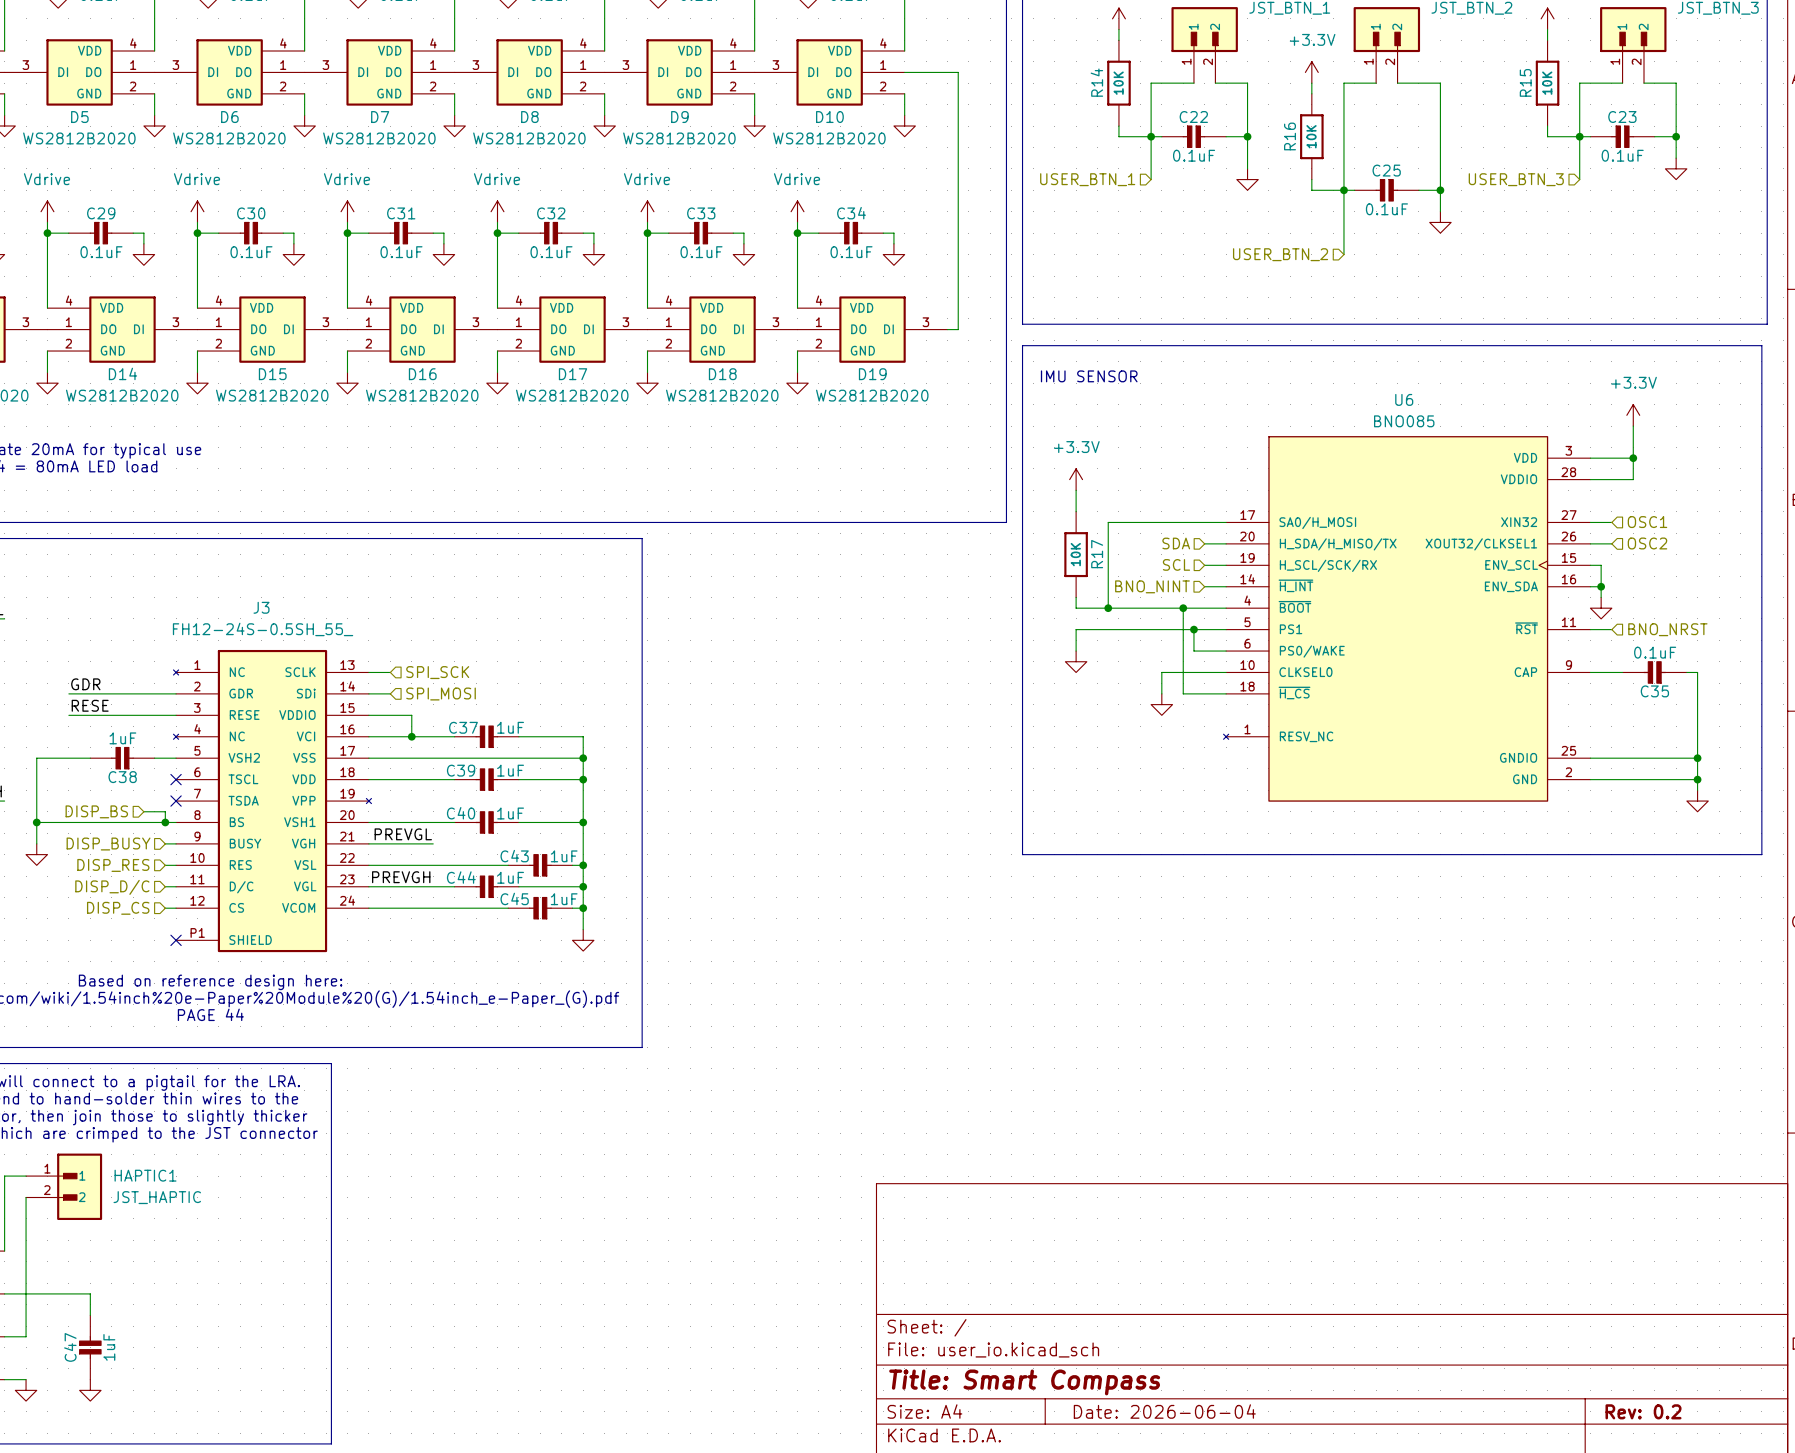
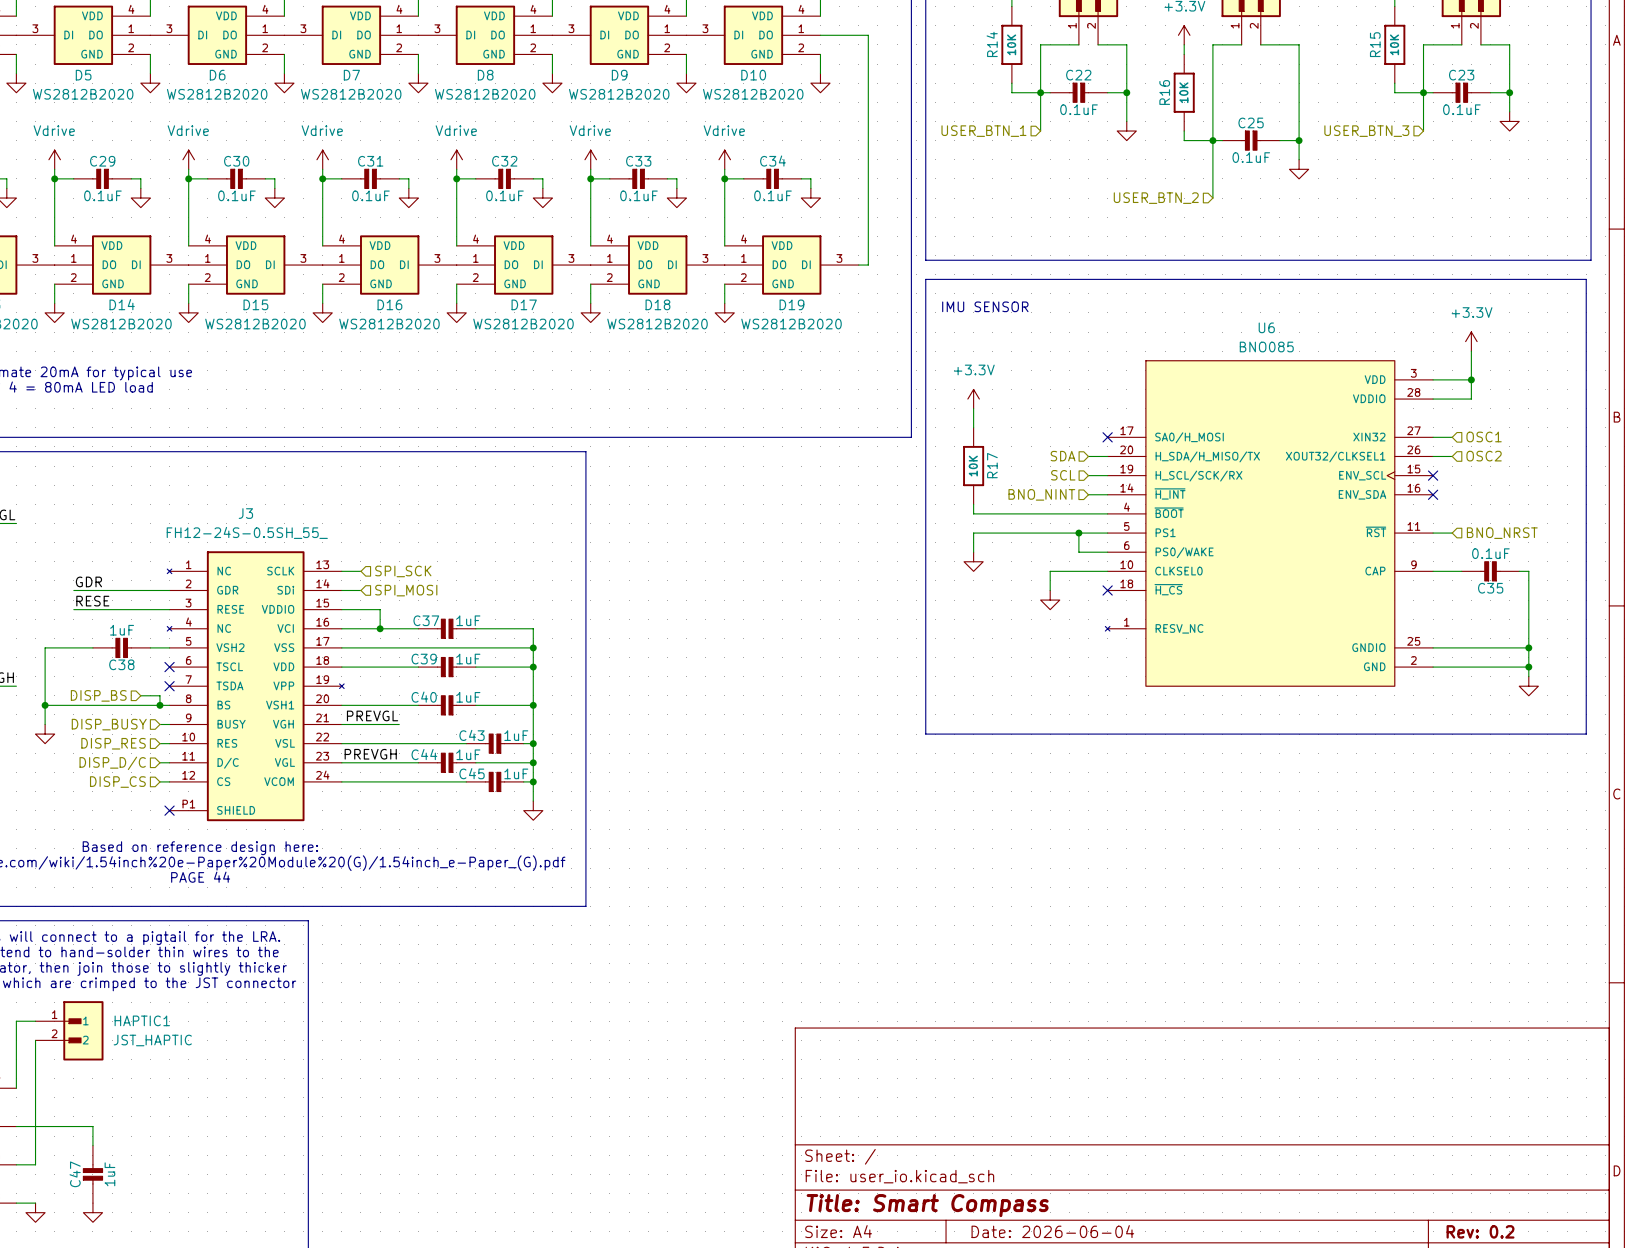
wire: (1226, 522) (1108, 522) (1108, 608) -> none
no-connect mark: none -> (1107, 437)
wire: (1590, 565) (1601, 565) (1601, 597) -> none
no-connect mark: none -> (1433, 475)
wire: (1590, 586) (1601, 586) -> none
no-connect mark: none -> (1433, 494)
junction: (1601, 586) -> none
junction: (1108, 608) -> none
wire: (1183, 608) (1183, 693) (1226, 693) -> none
junction: (1183, 608) -> none
power symbol: (1601, 608) -> none
no-connect mark: none -> (1107, 590)

